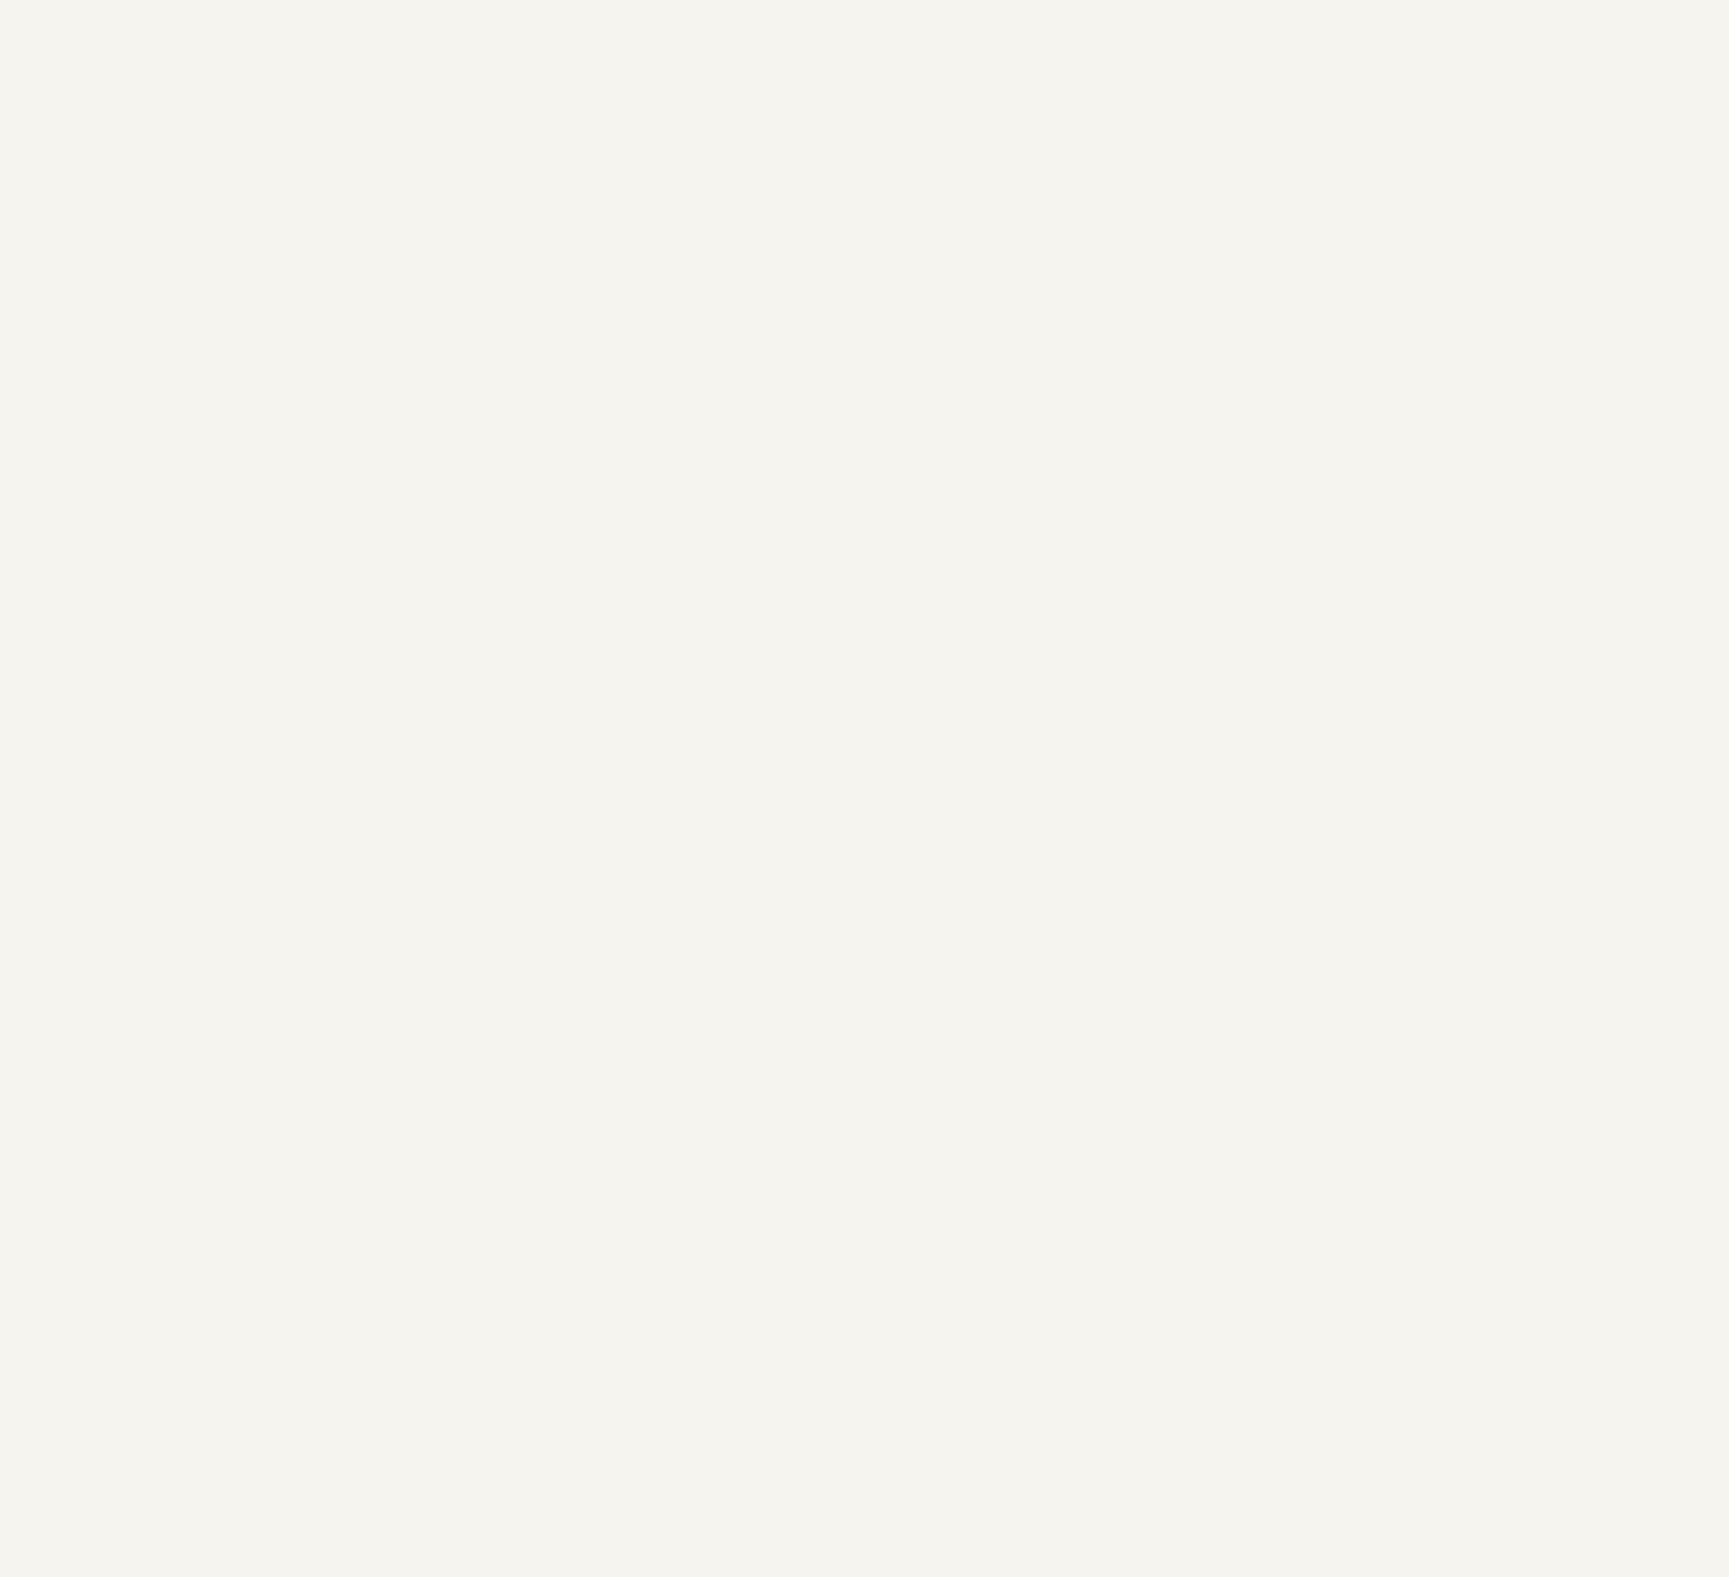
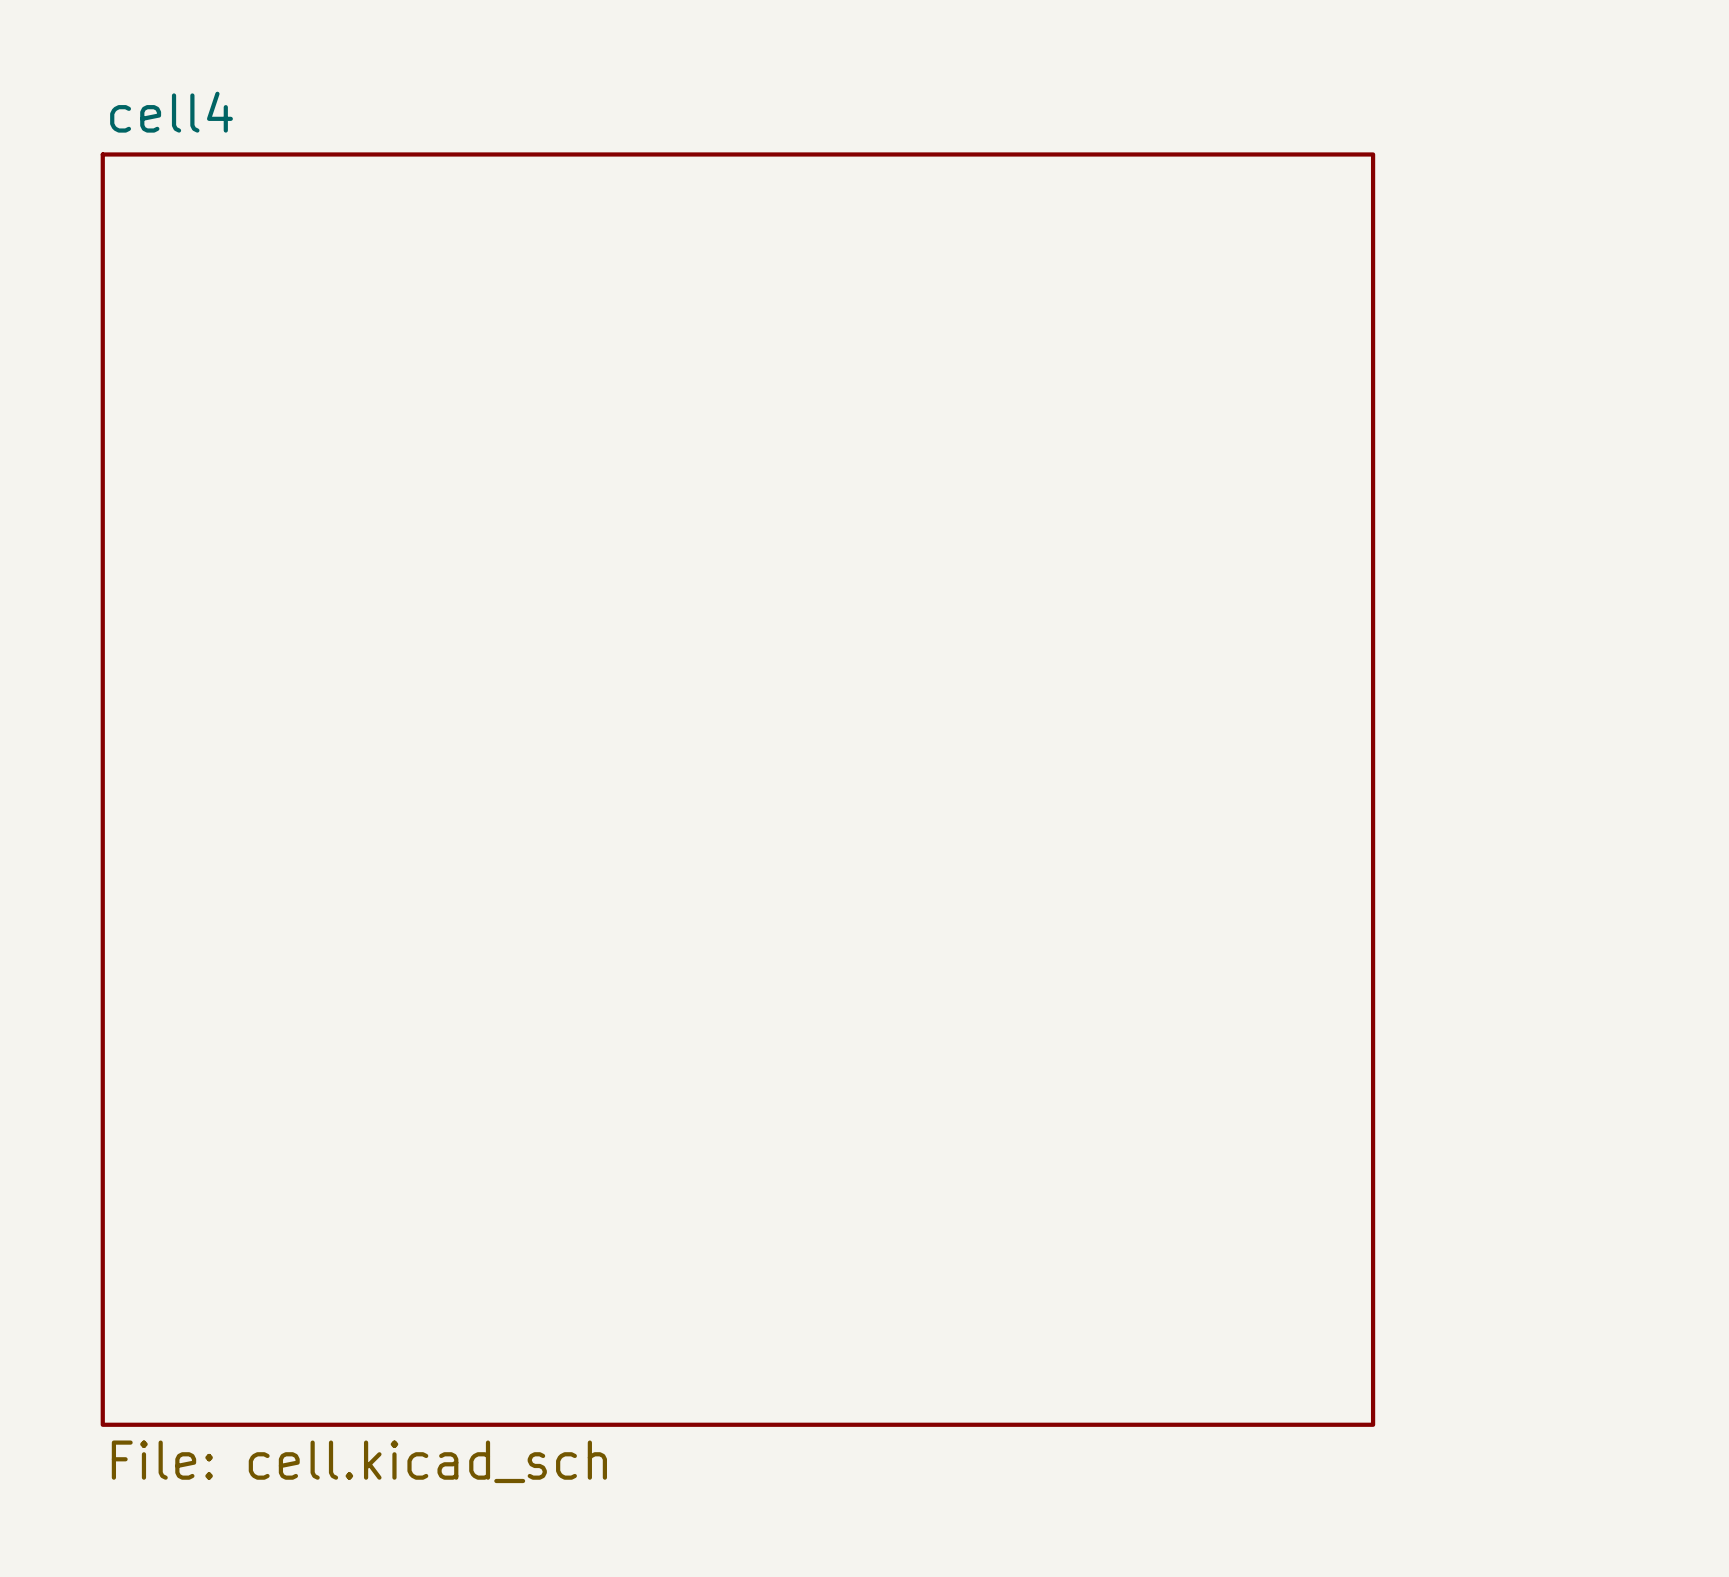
sheet cell4: none -> File: cell.kicad_sch (737, 789)

